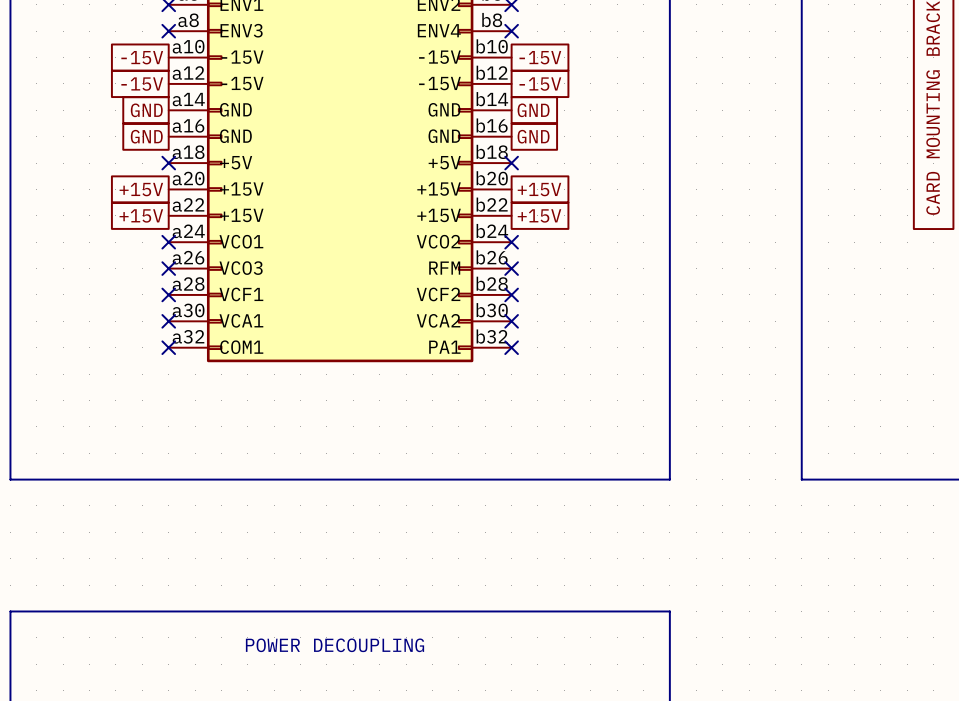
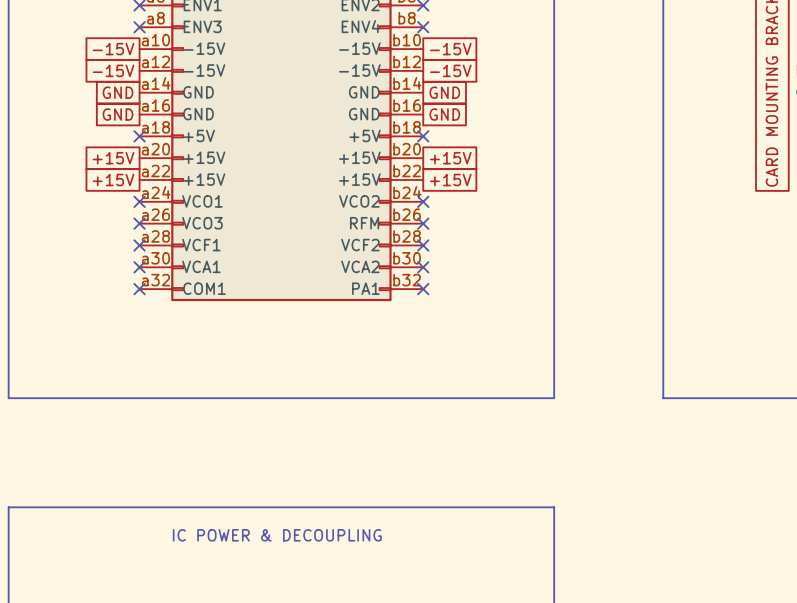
text: POWER DECOUPLING (335, 645) -> IC POWER & DECOUPLING (277, 535)

